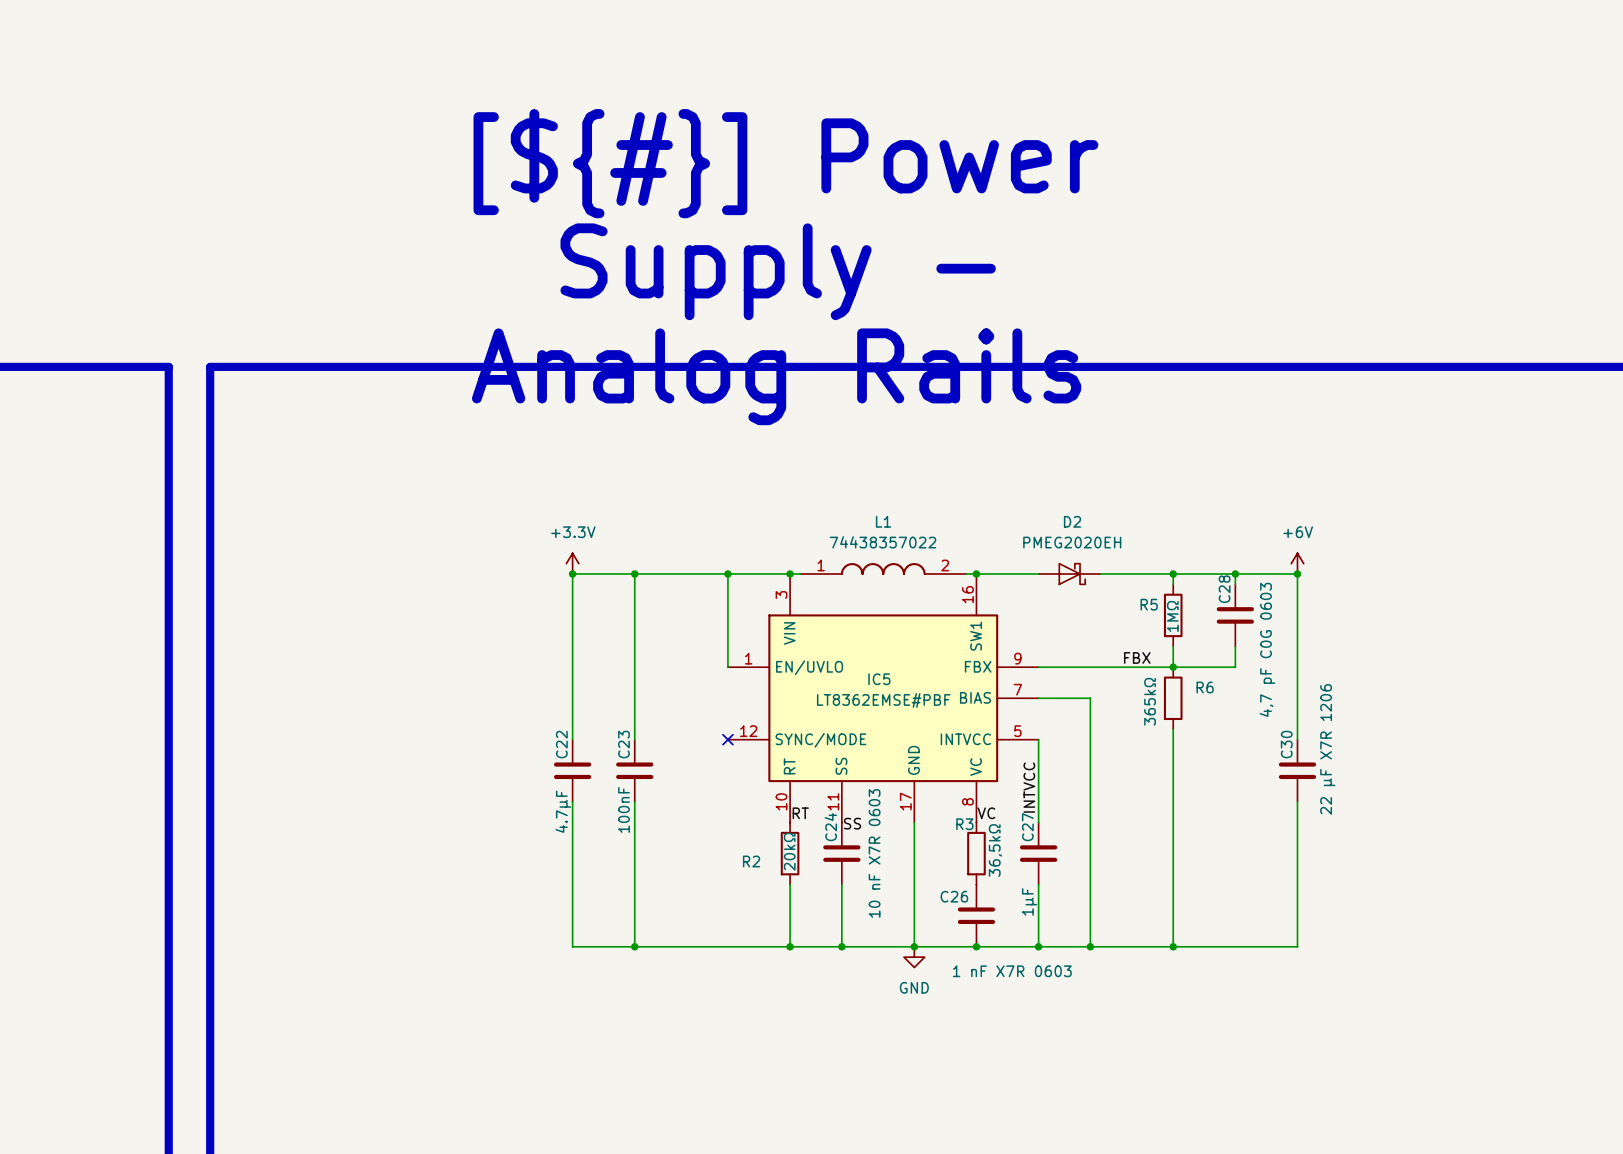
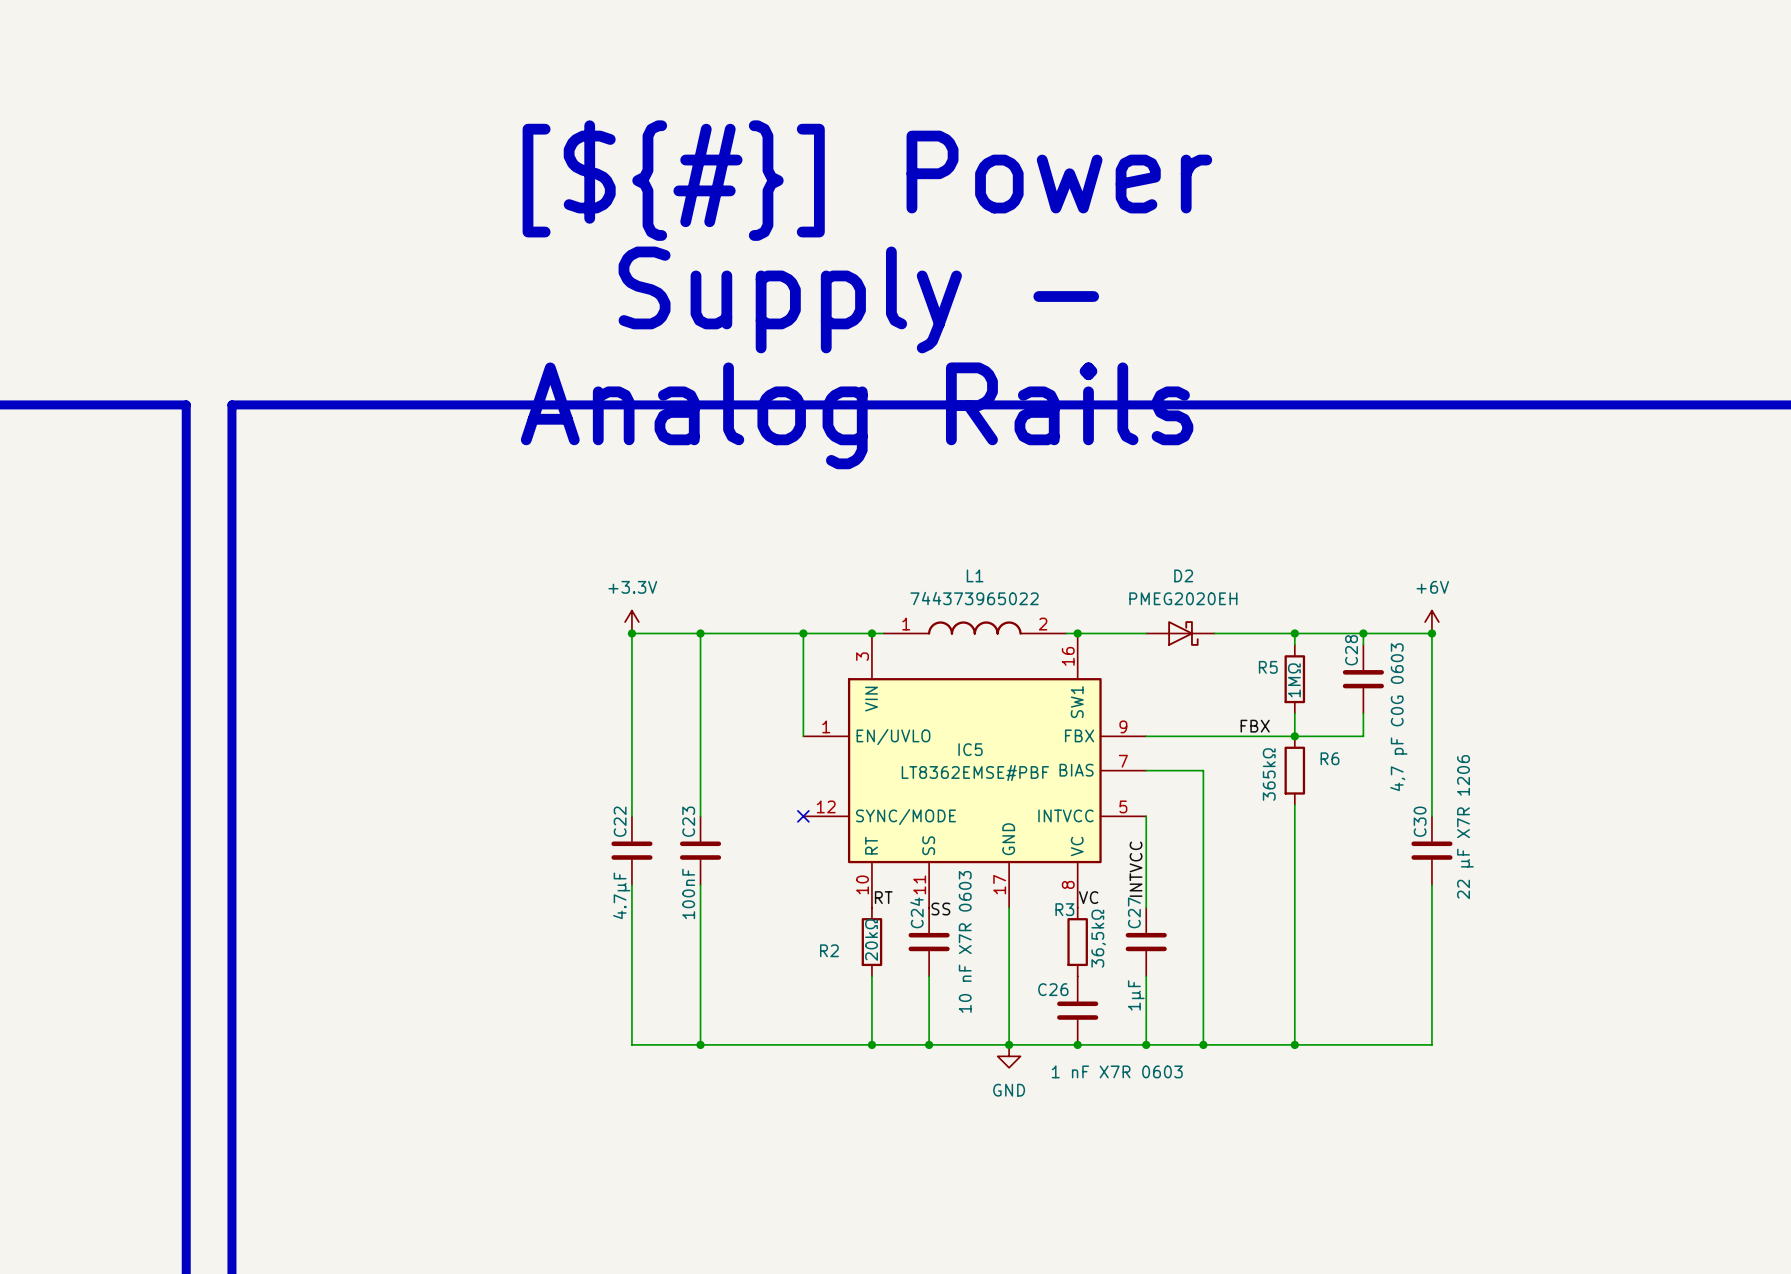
L1 value: 74438357022 (883, 542) -> 744373965022 (974, 598)

